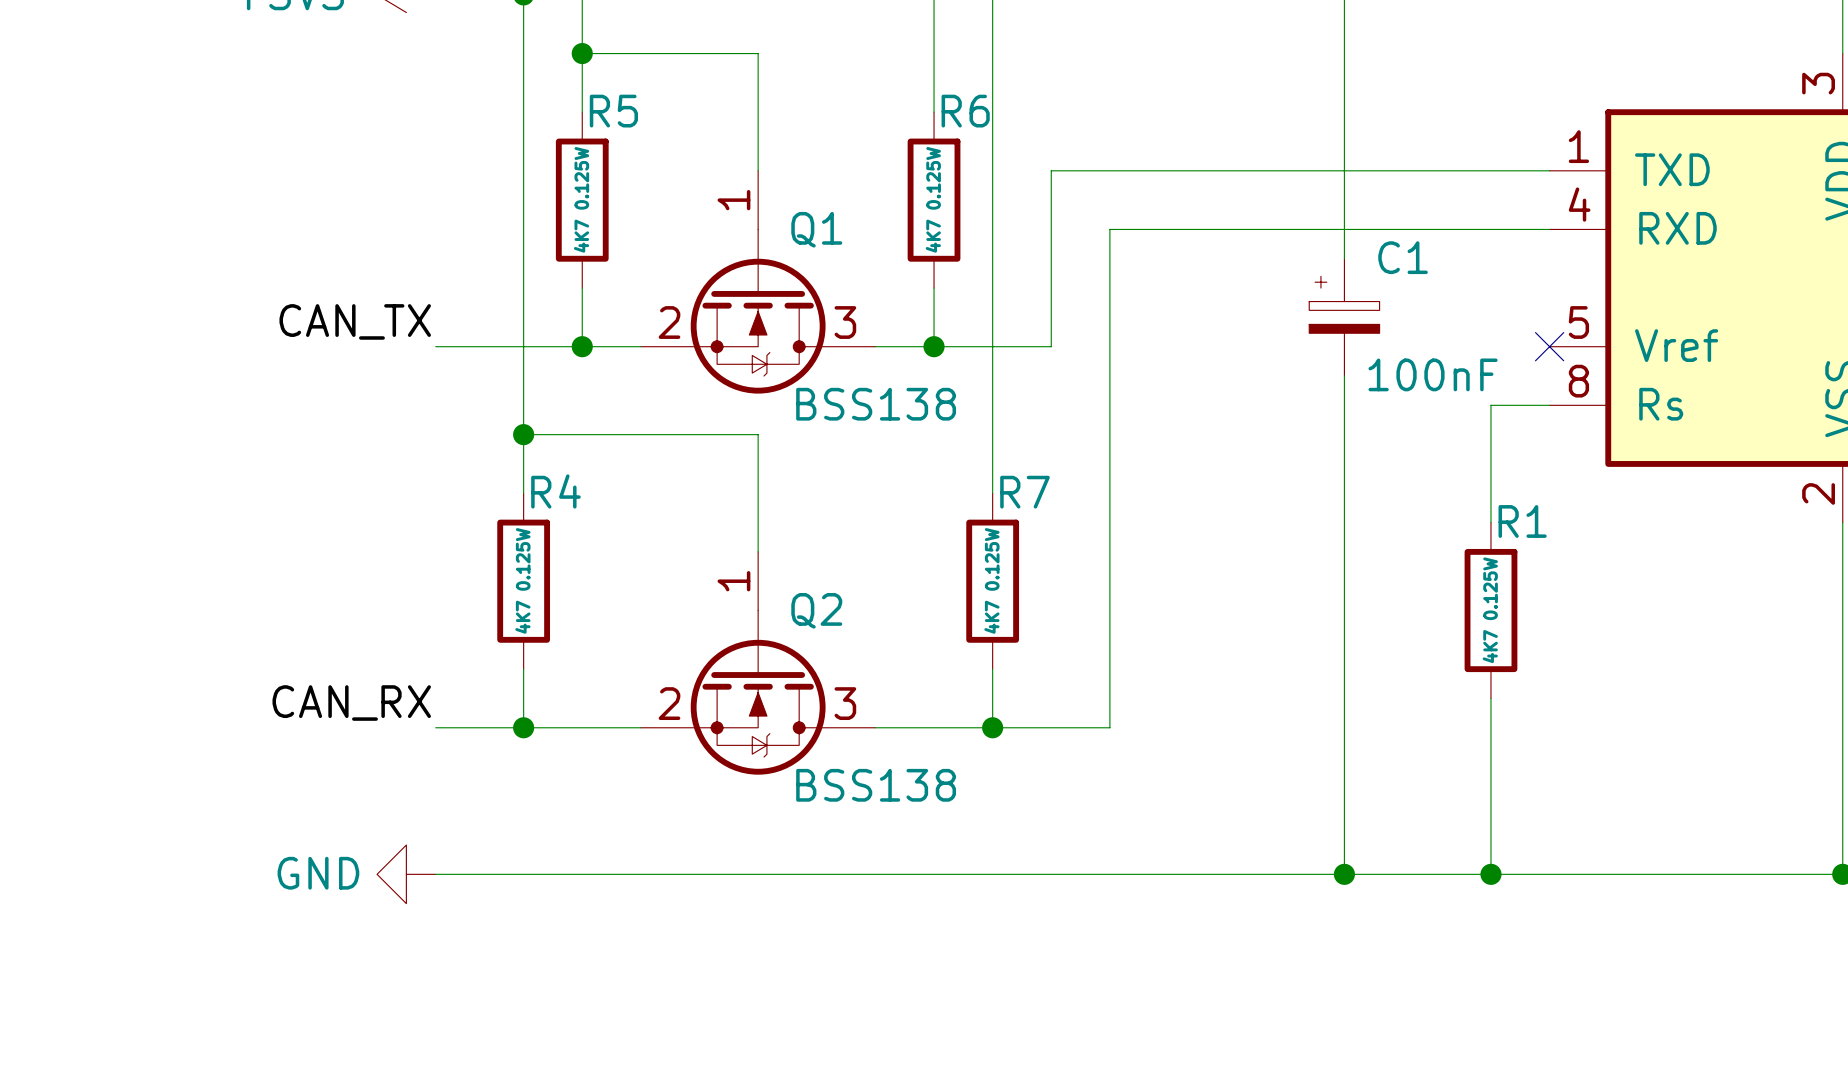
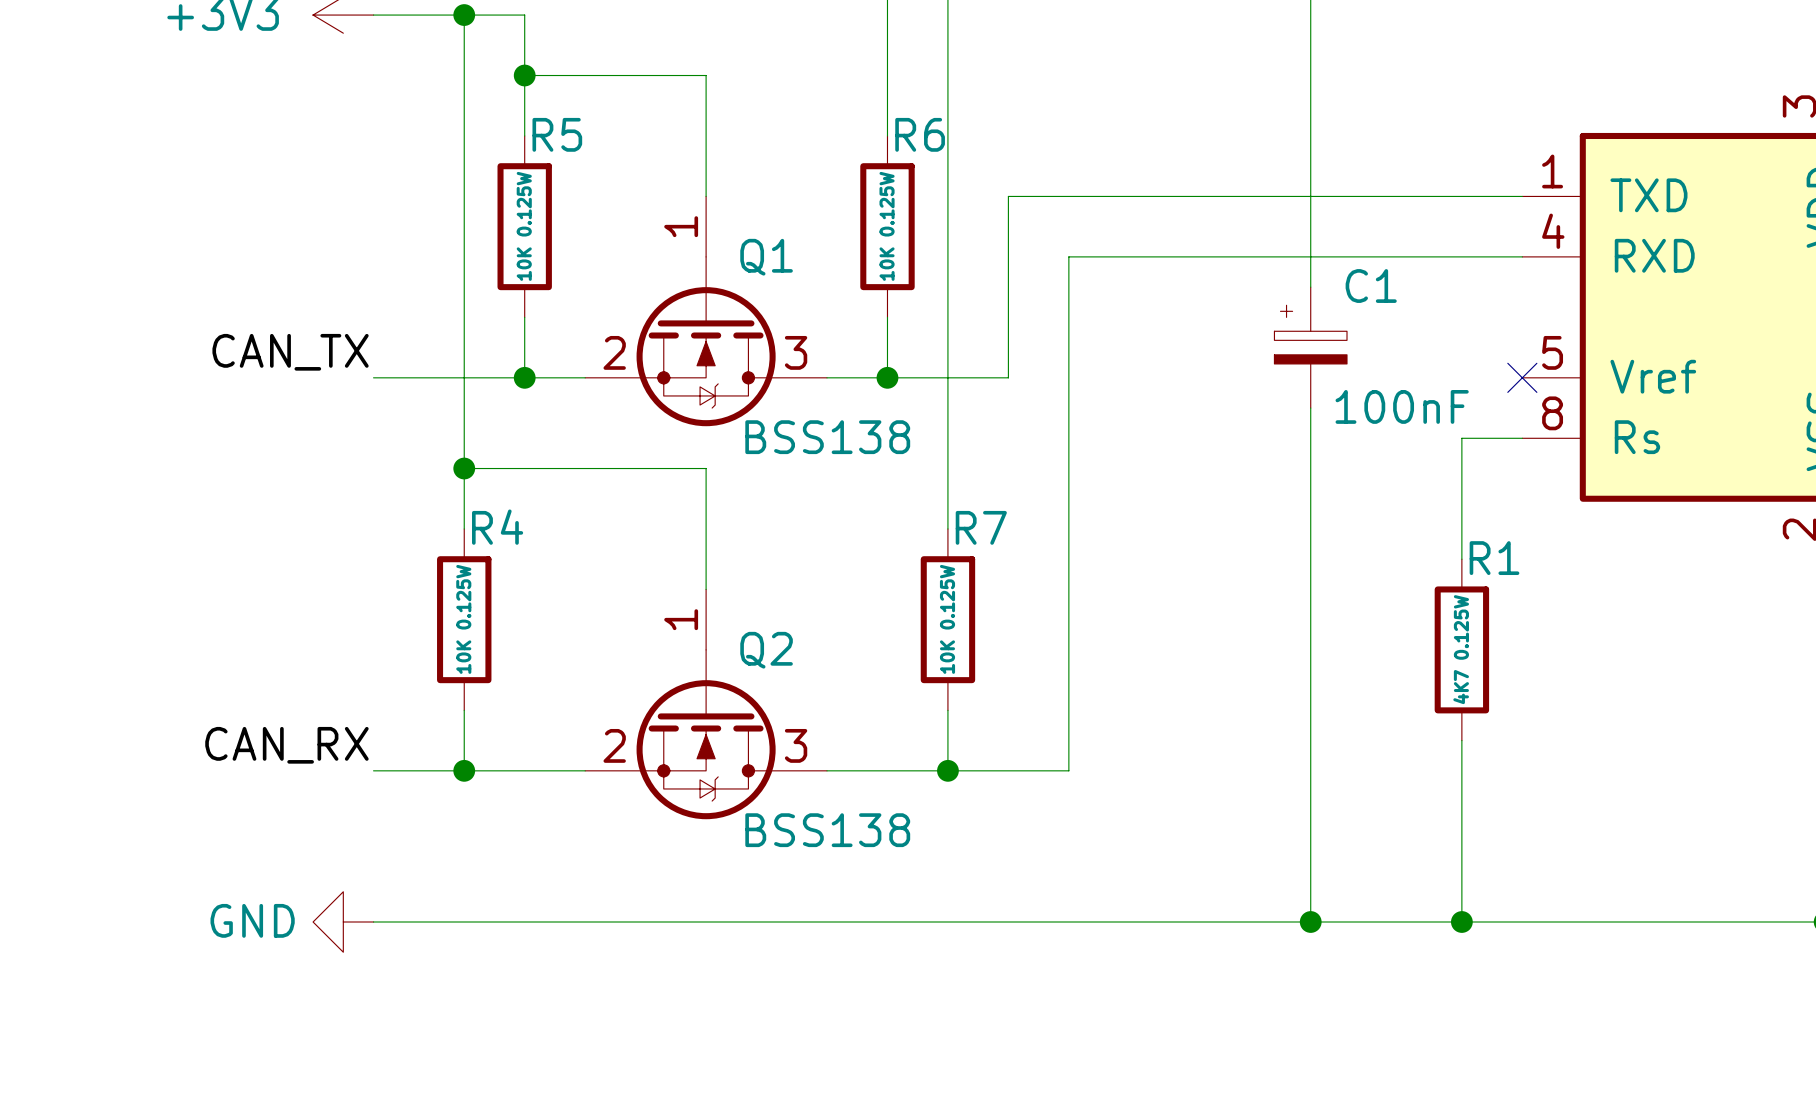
R5 value: 4K7 0.125W (581, 199) -> 10K 0.125W (524, 226)
R6 value: 4K7 0.125W (933, 199) -> 10K 0.125W (887, 226)
R4 value: 4K7 0.125W (522, 580) -> 10K 0.125W (463, 619)
R7 value: 4K7 0.125W (991, 580) -> 10K 0.125W (947, 619)

